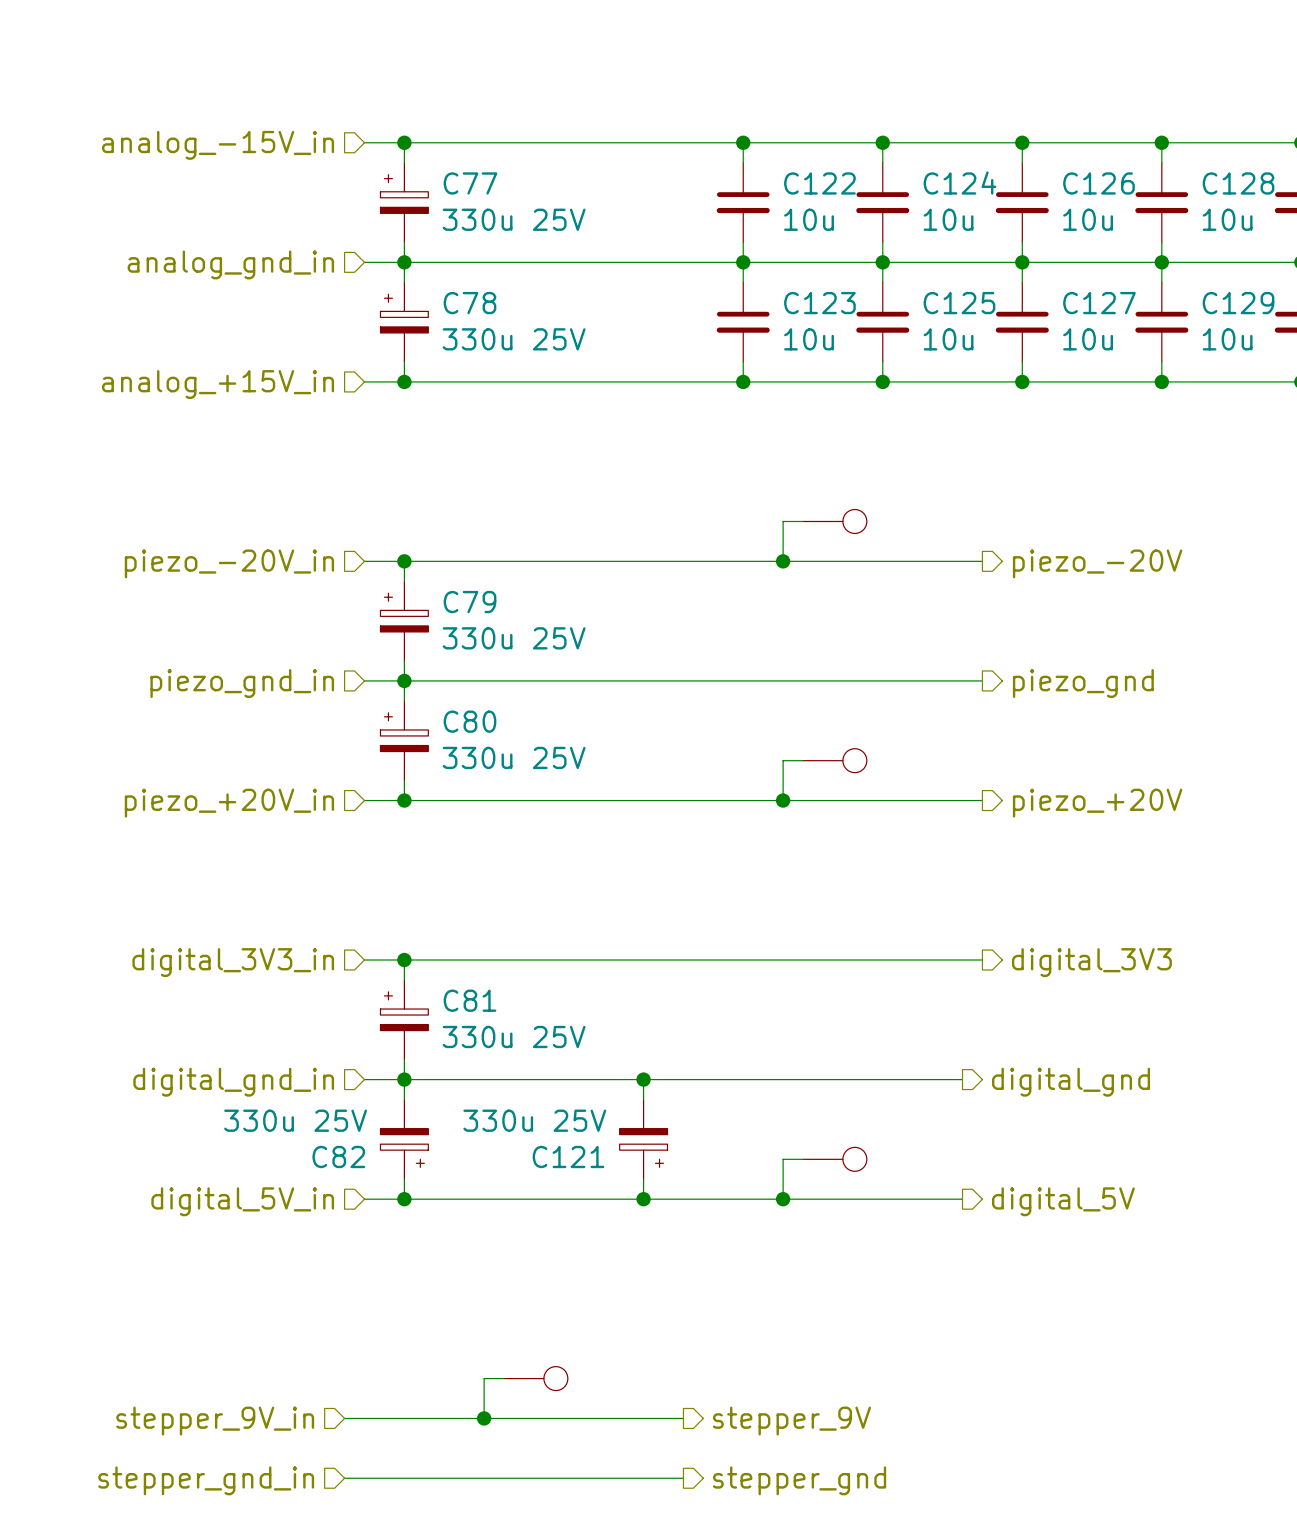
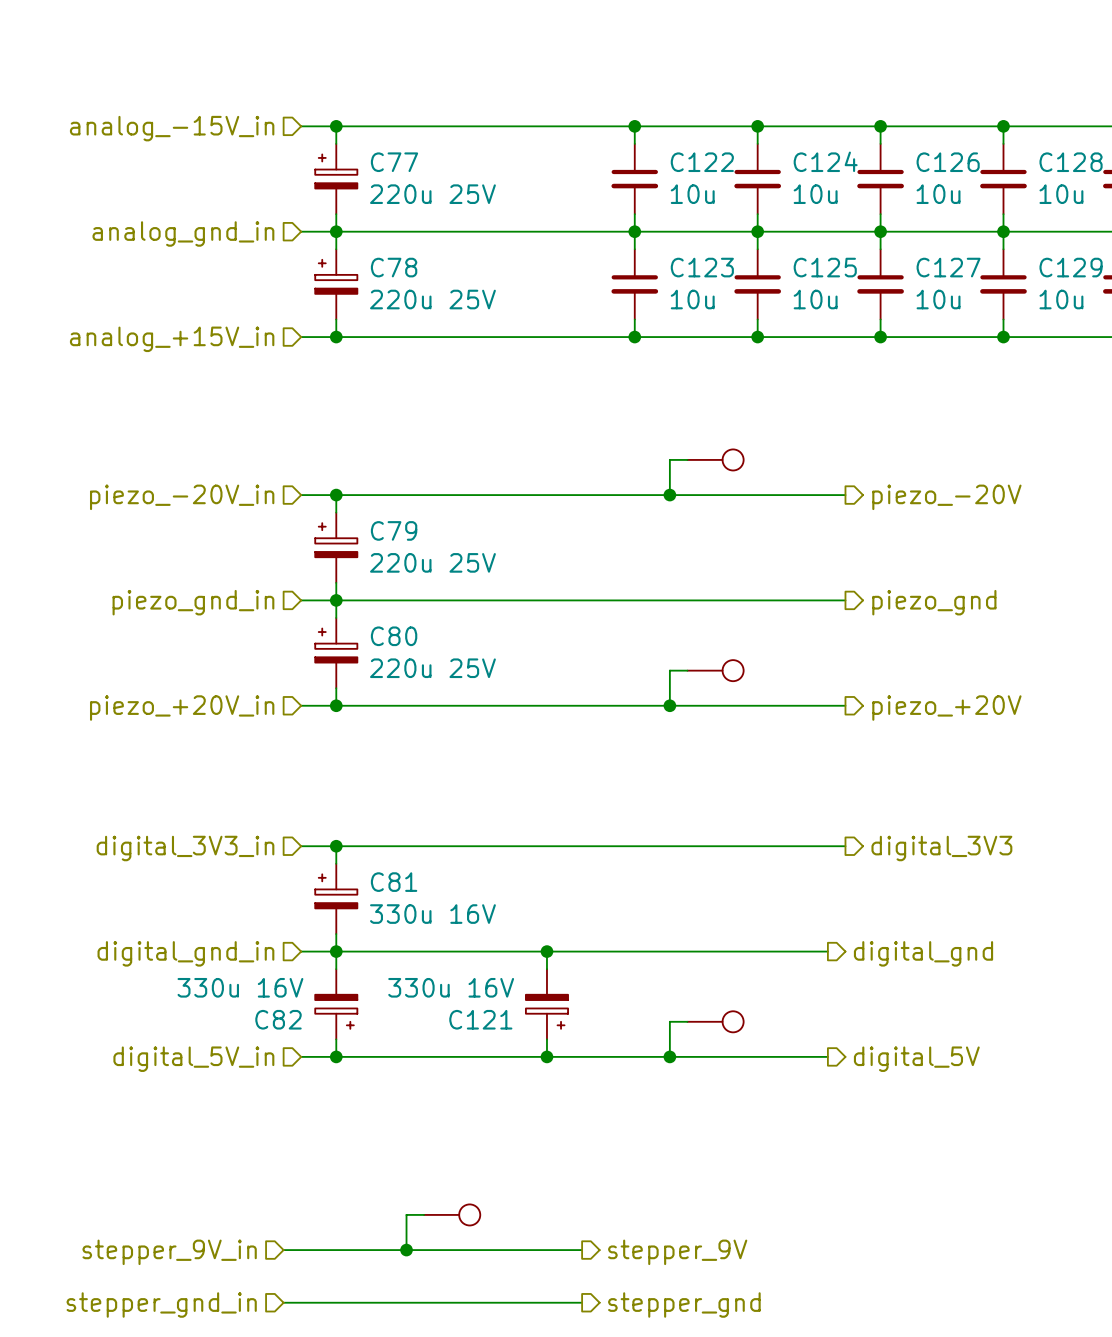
C77 value: 330u 25V (514, 219) -> 220u 25V (432, 194)
C78 value: 330u 25V (514, 339) -> 220u 25V (432, 299)
C79 value: 330u 25V (514, 638) -> 220u 25V (432, 562)
C80 value: 330u 25V (514, 757) -> 220u 25V (432, 668)
C81 value: 330u 25V (514, 1036) -> 330u 16V (432, 914)
C82 value: 330u 25V (295, 1120) -> 330u 16V (240, 987)
C121 value: 330u 25V (534, 1120) -> 330u 16V (451, 987)

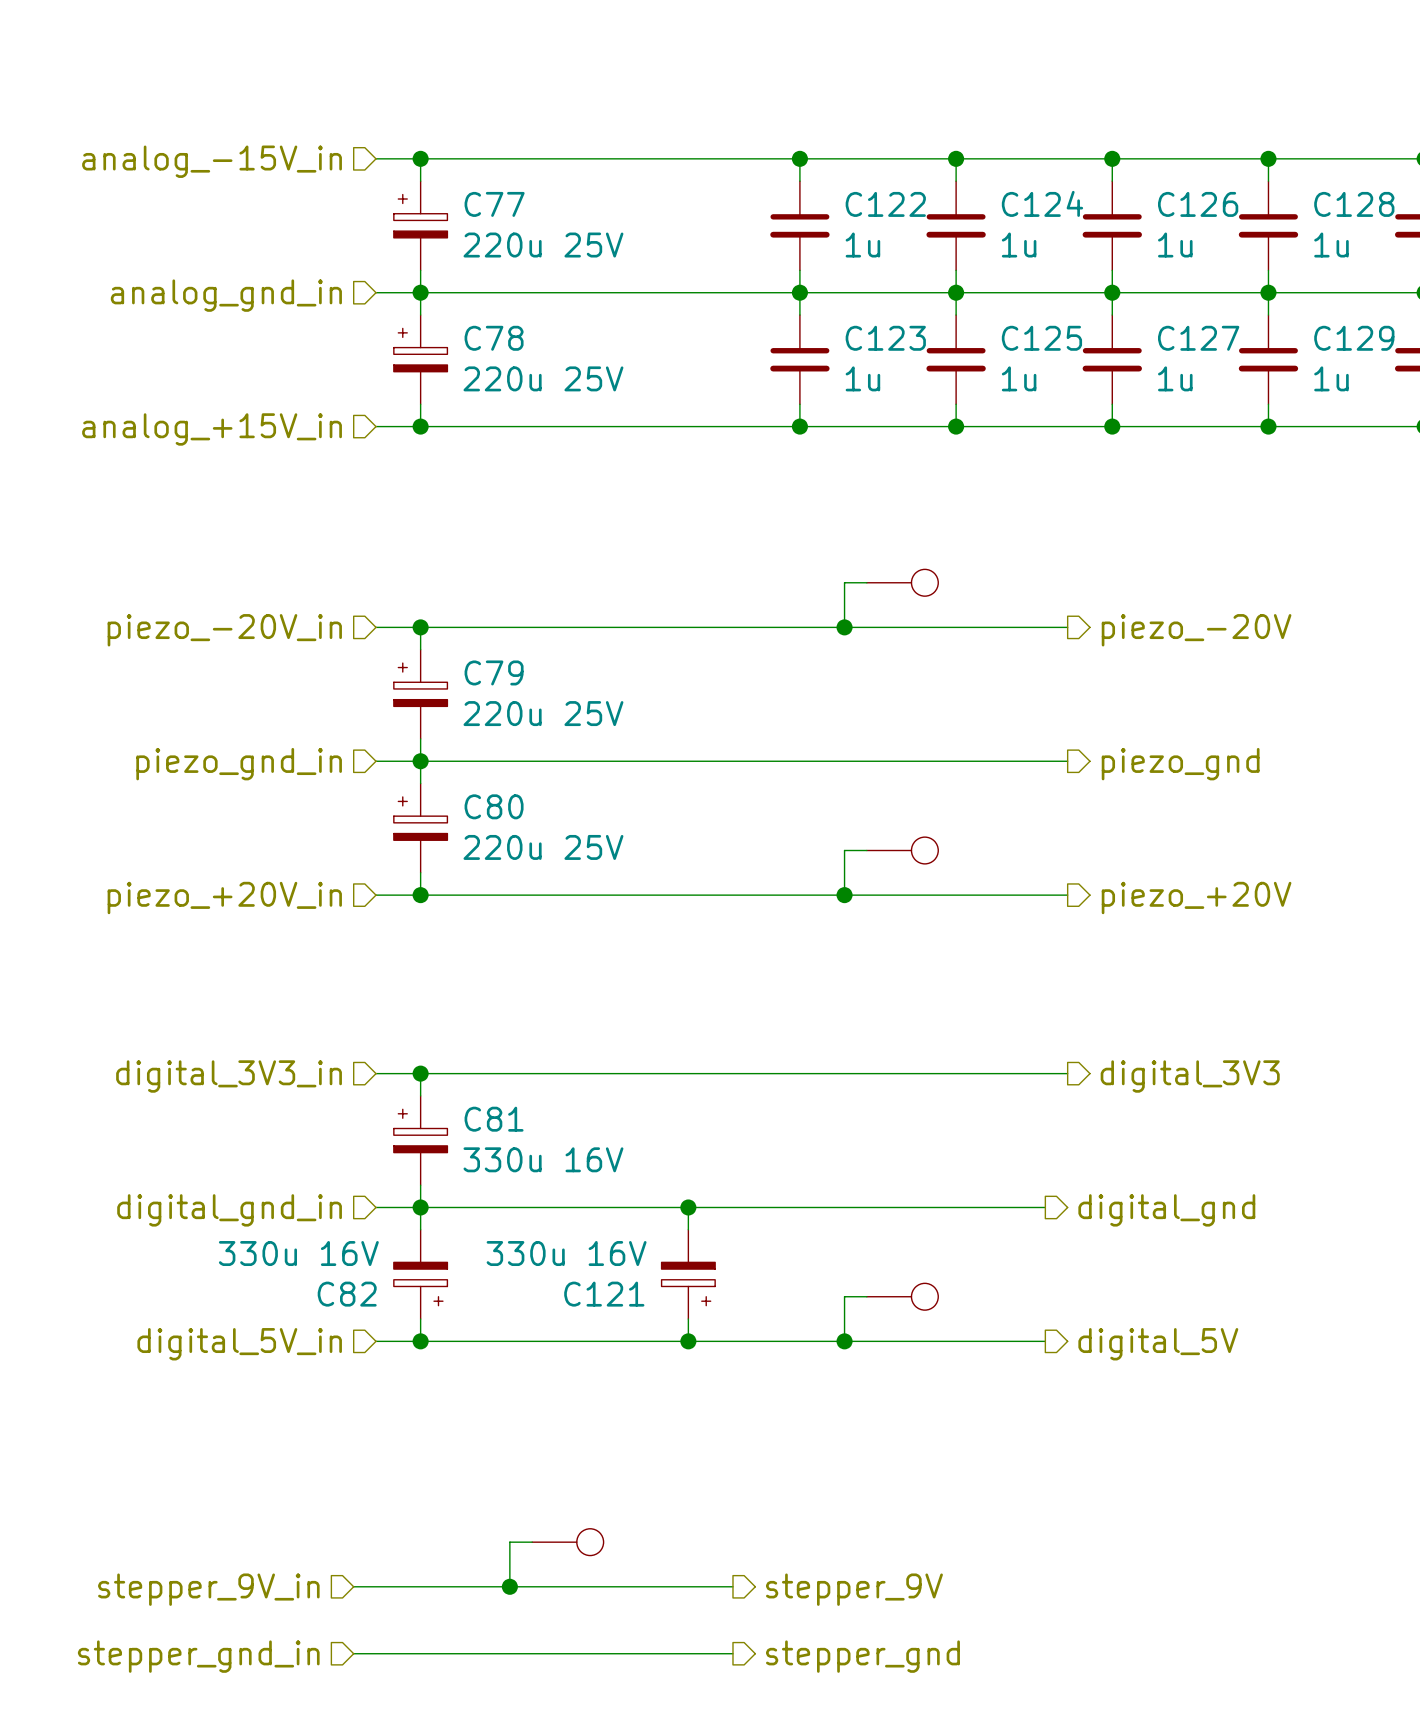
C122 value: 10u (692, 194) -> 1u (862, 245)
C124 value: 10u (815, 194) -> 1u (1019, 245)
C126 value: 10u (938, 194) -> 1u (1175, 245)
C128 value: 10u (1061, 194) -> 1u (1331, 245)
C123 value: 10u (692, 299) -> 1u (862, 378)
C125 value: 10u (815, 299) -> 1u (1019, 378)
C127 value: 10u (938, 299) -> 1u (1175, 378)
C129 value: 10u (1061, 299) -> 1u (1331, 378)

